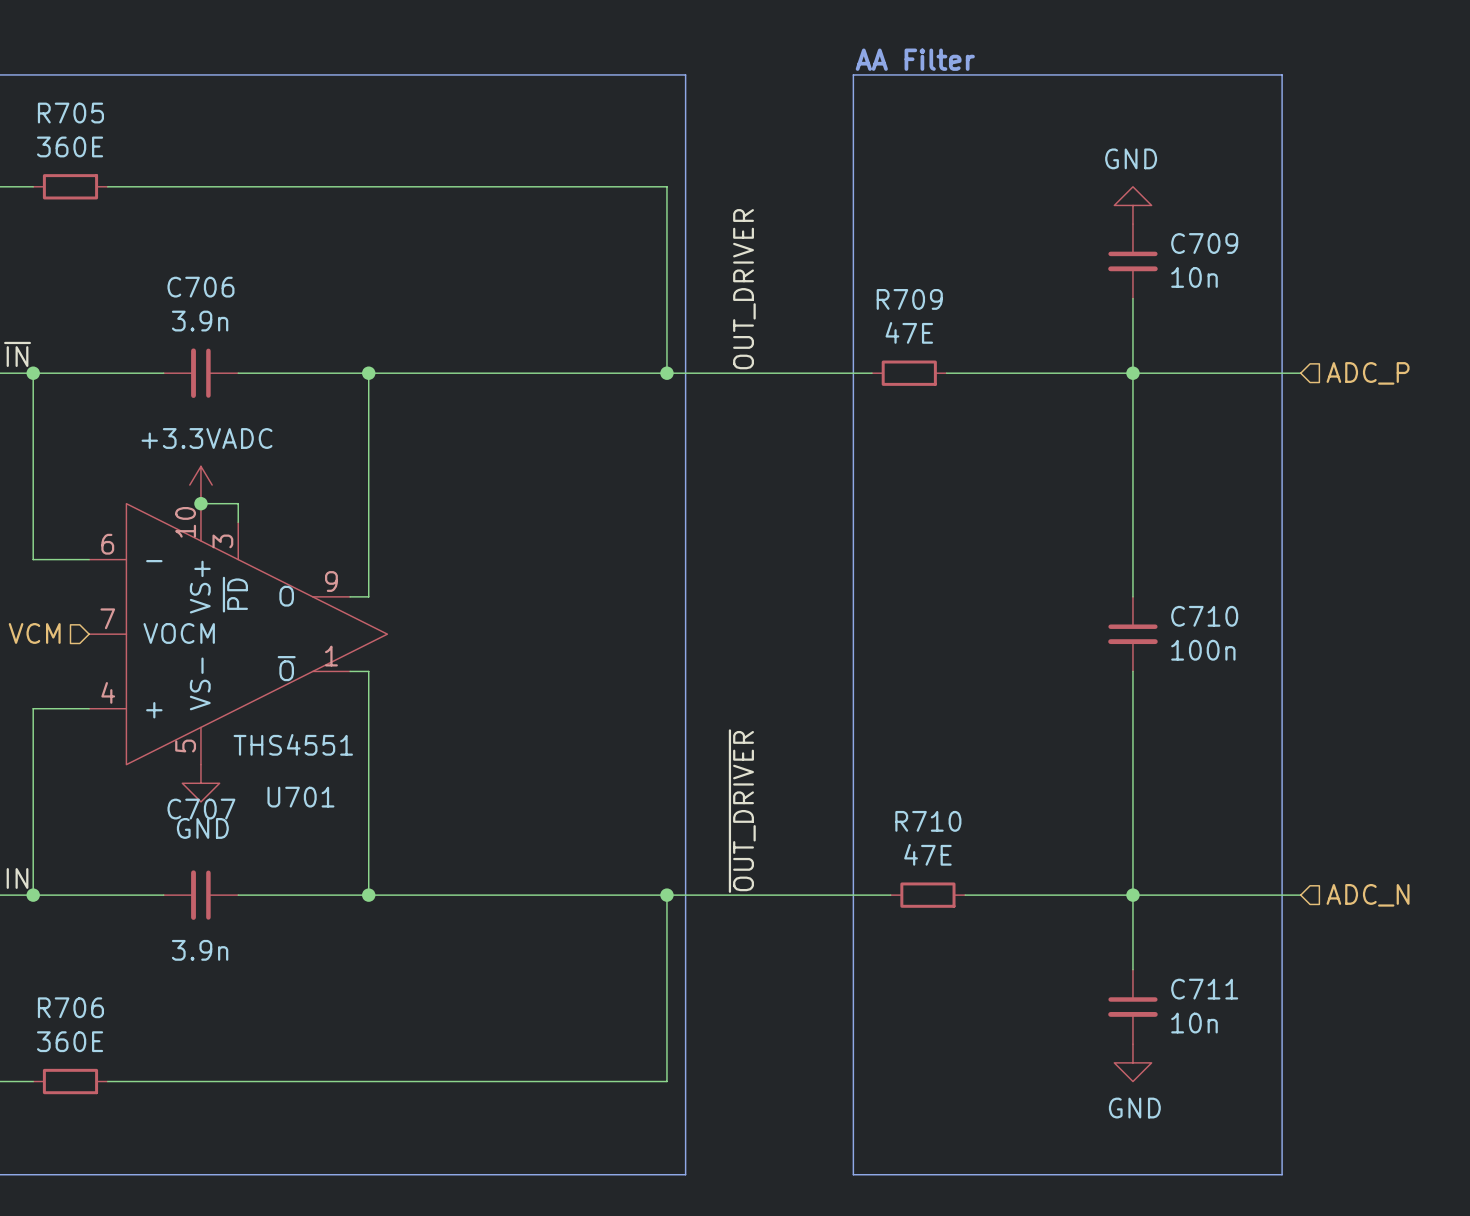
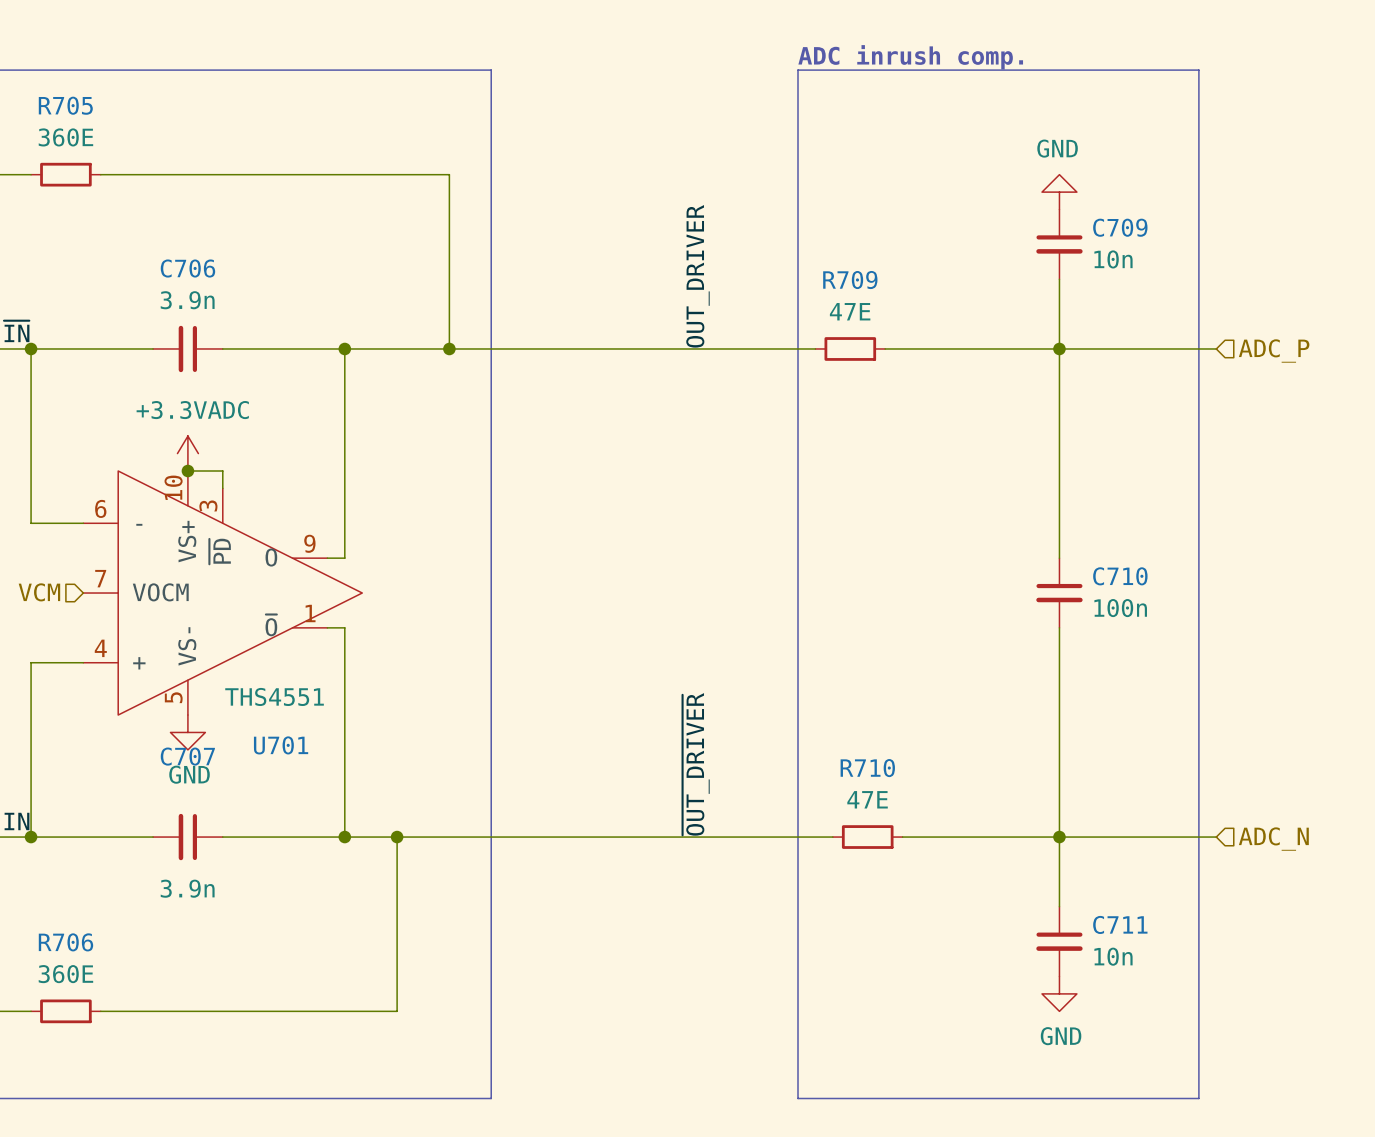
text: AA Filter (915, 59) -> ADC inrush comp. (910, 57)
line: (525, 74) (685, 74) (685, 1174) (525, 1174) -> (491, 70) (491, 1098)
wire: (480, 186) (666, 186) (666, 373) -> (449, 174) (449, 348)
junction: none -> (449, 348)
junction: (666, 373) -> none
junction: none -> (397, 837)
wire: (666, 895) (666, 1081) (424, 1081) -> (397, 837) (397, 1011)
junction: (666, 895) -> none

